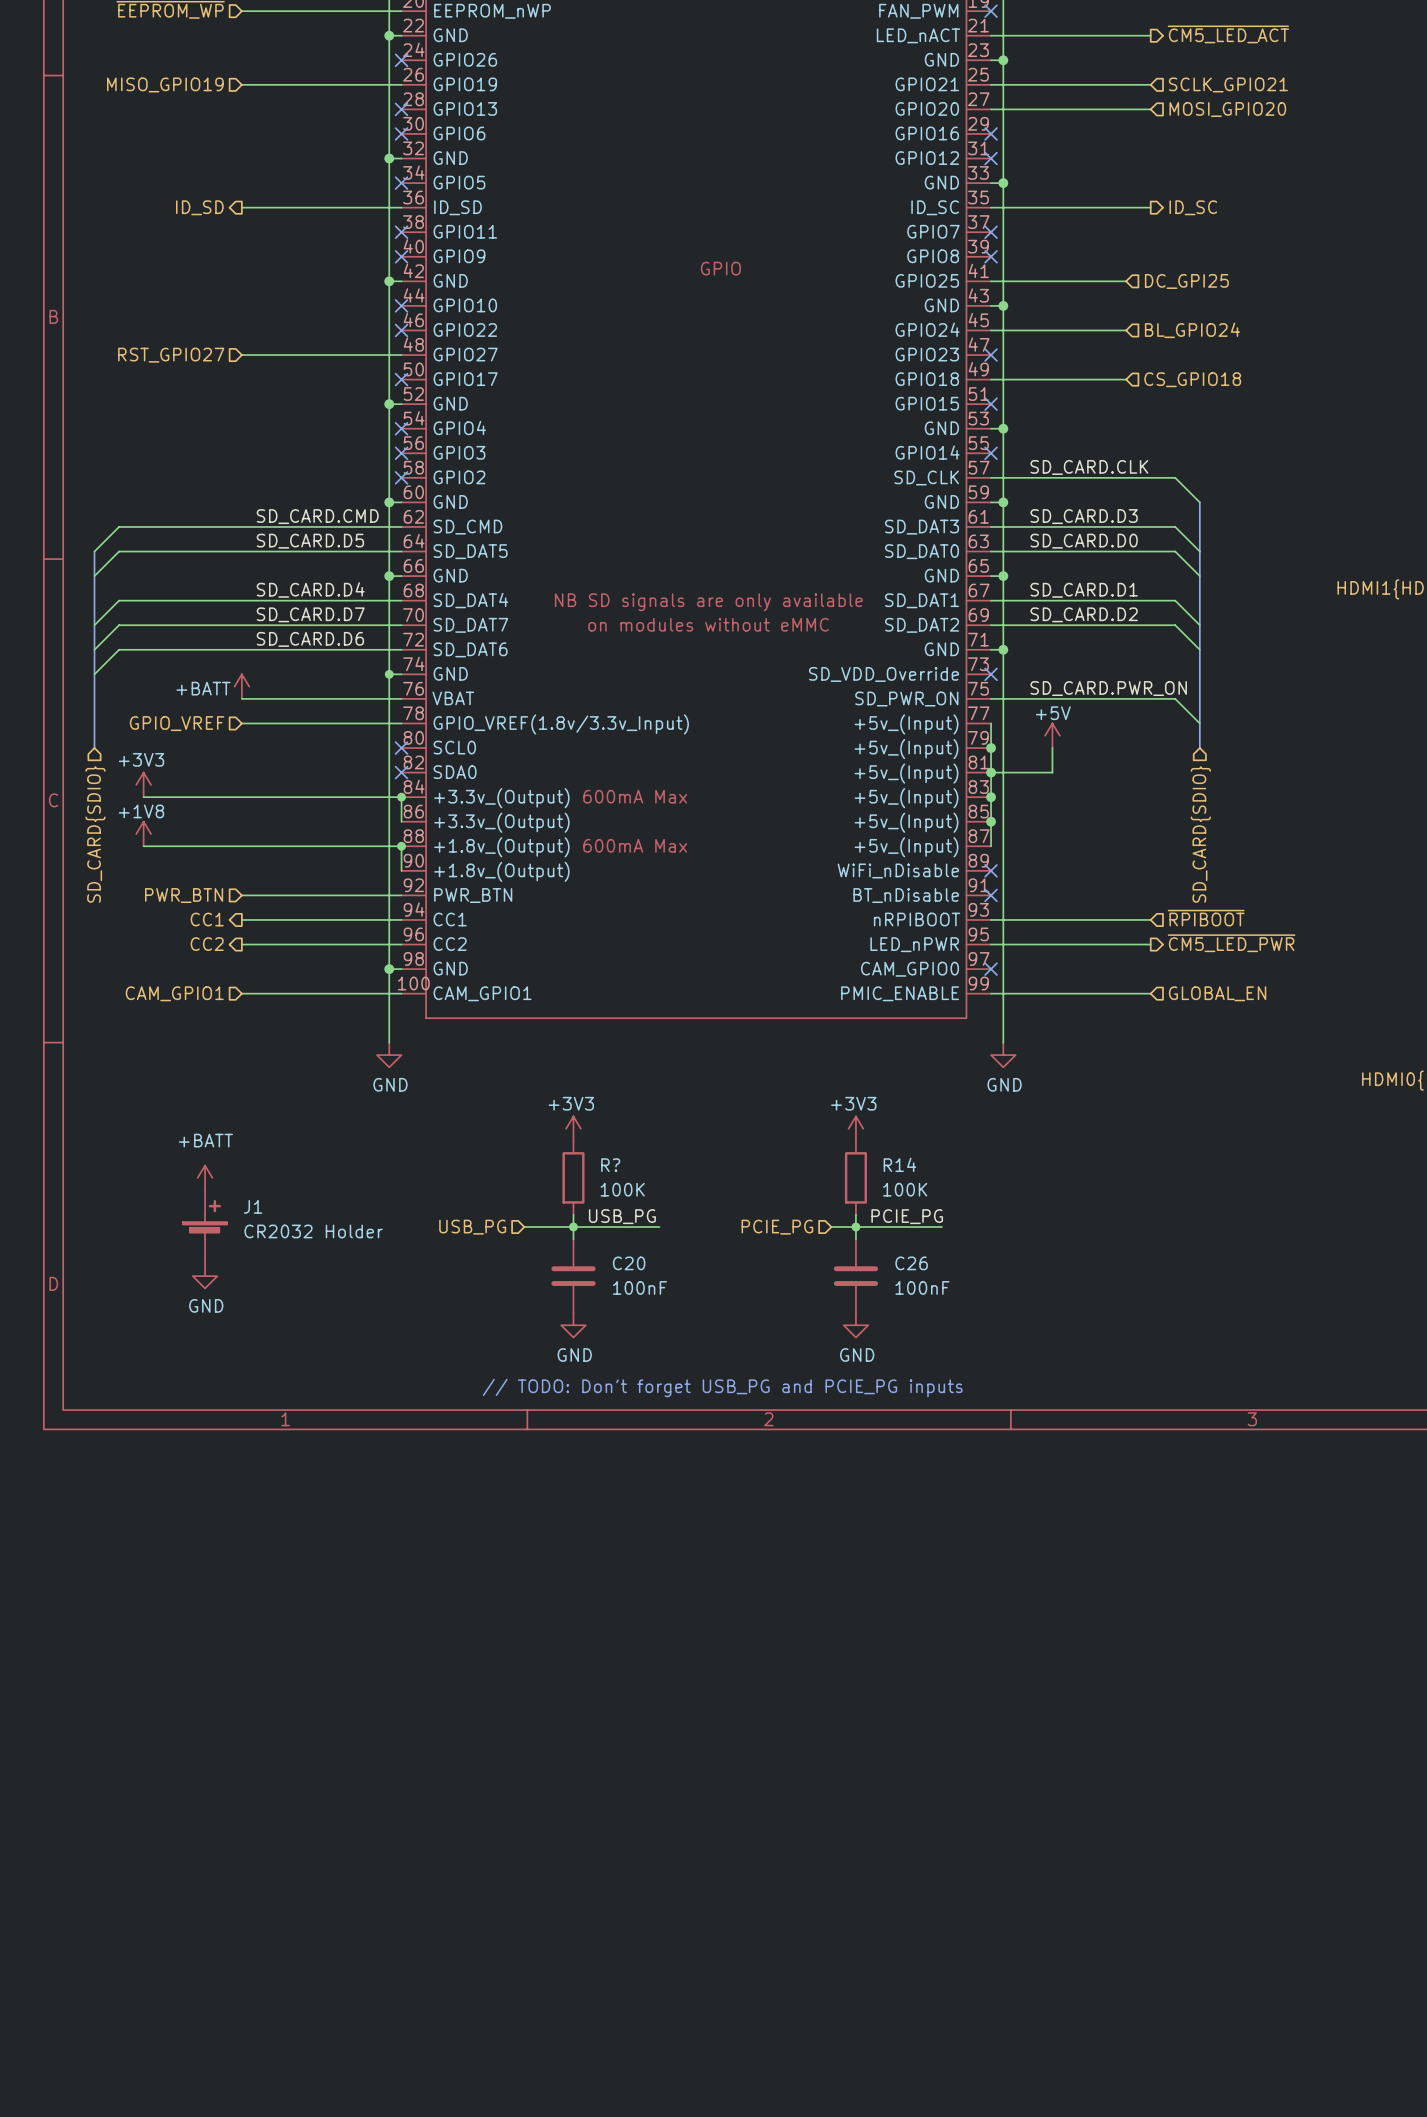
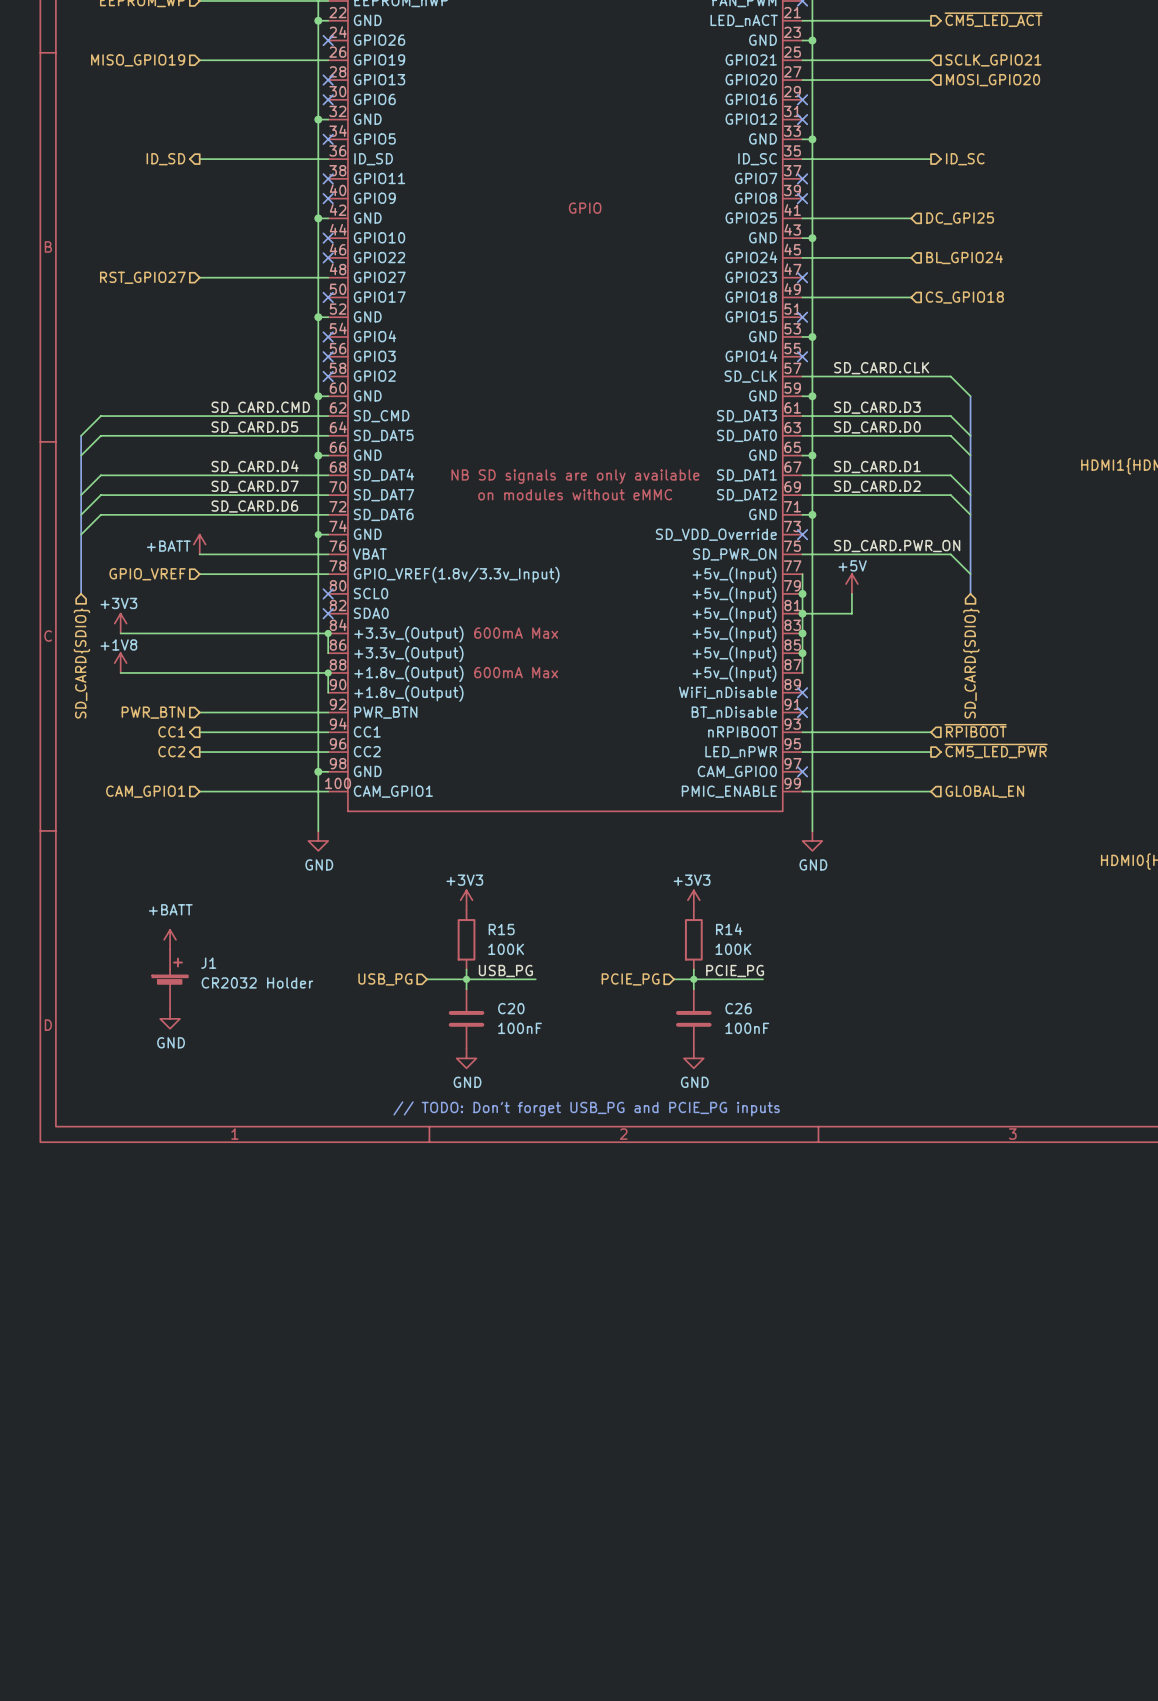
R? name: R? (610, 1165) -> R15 (501, 929)

